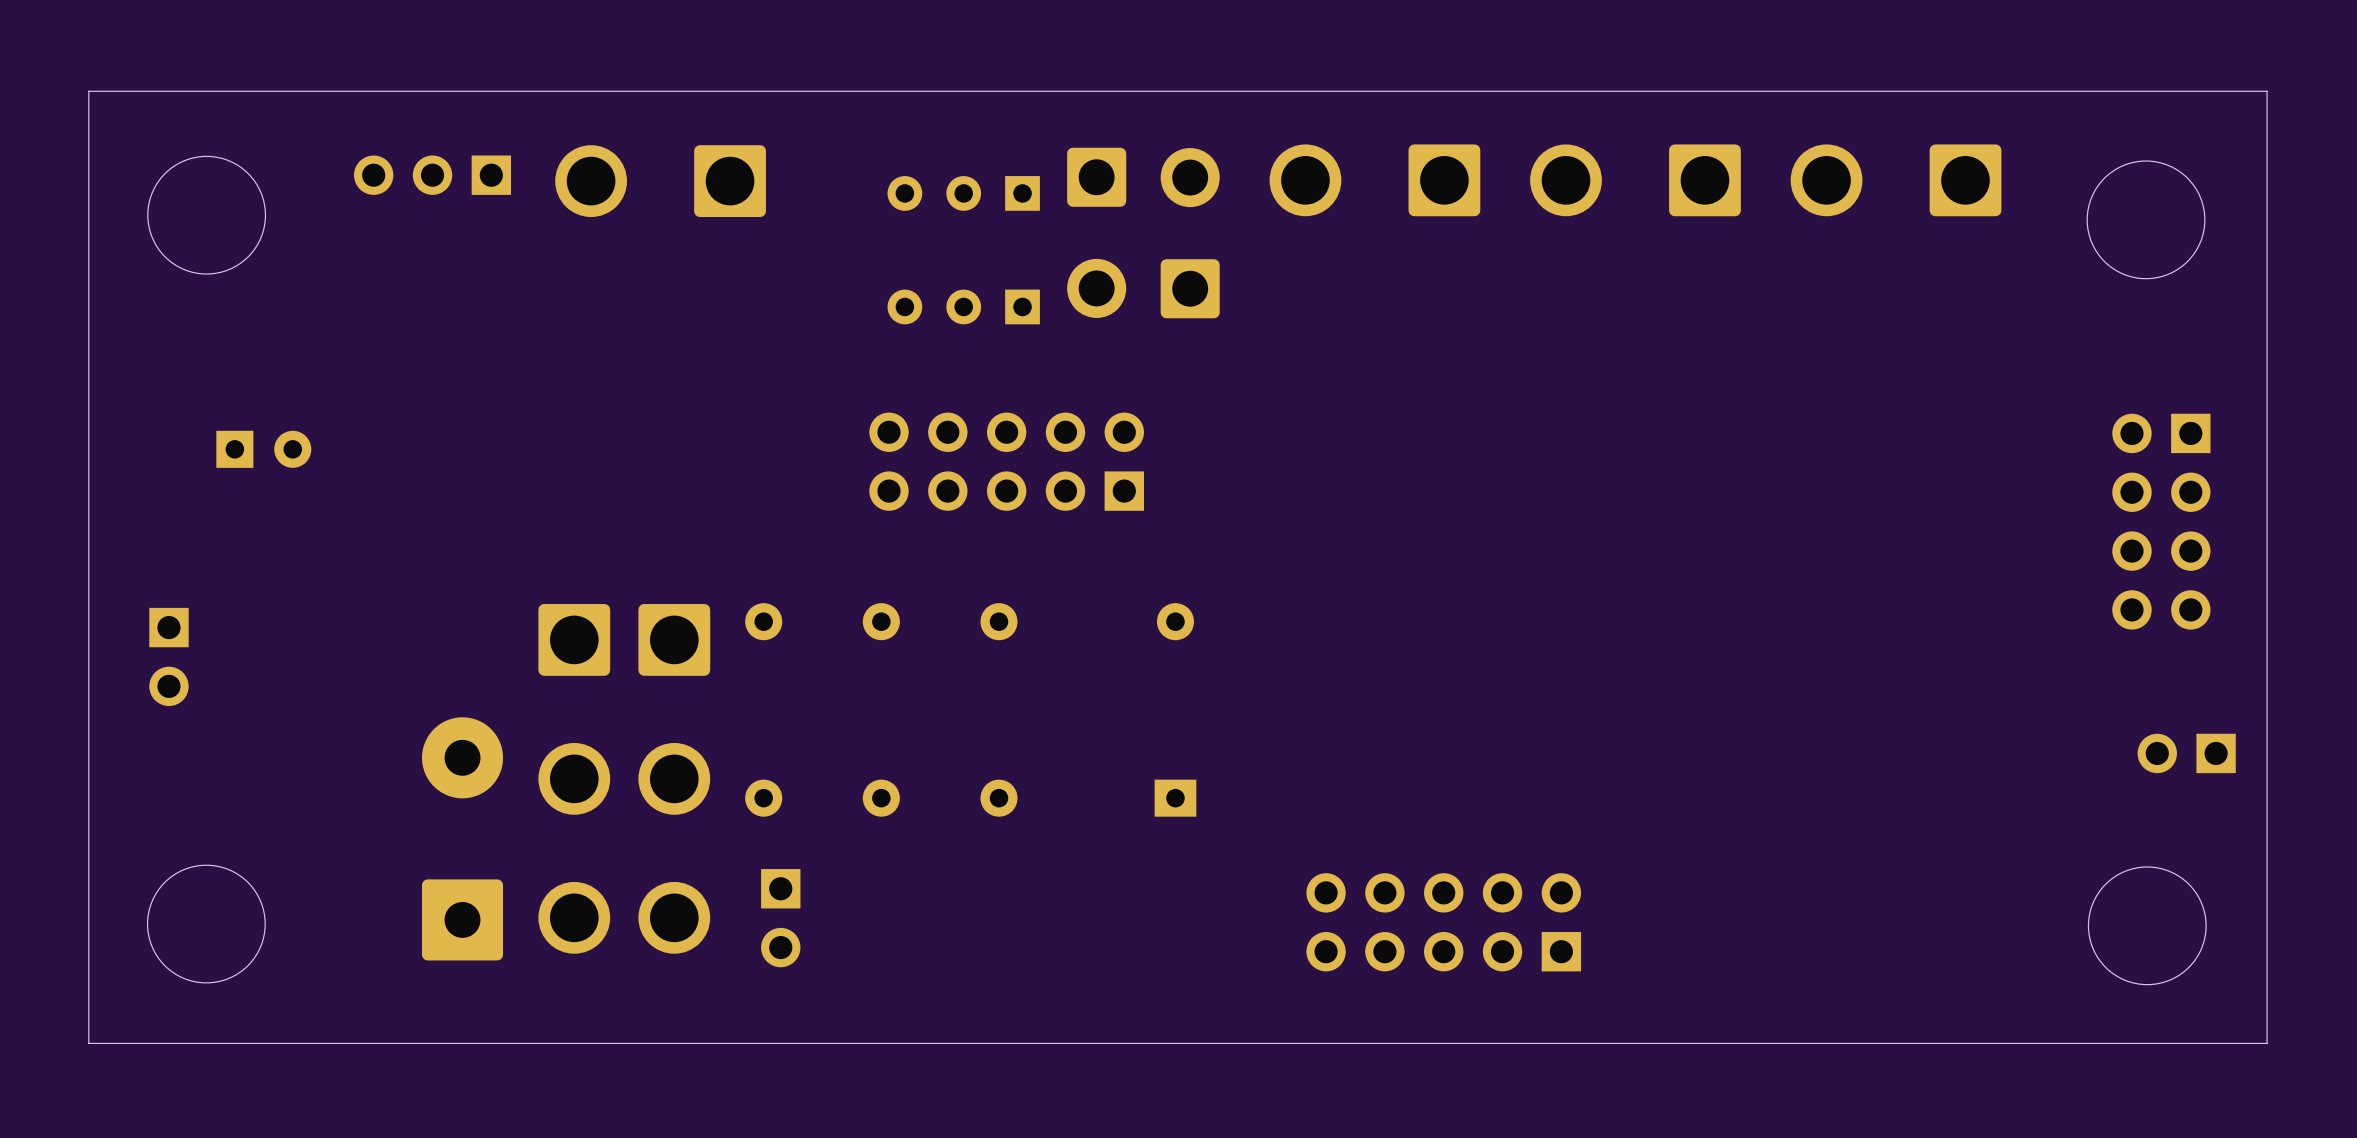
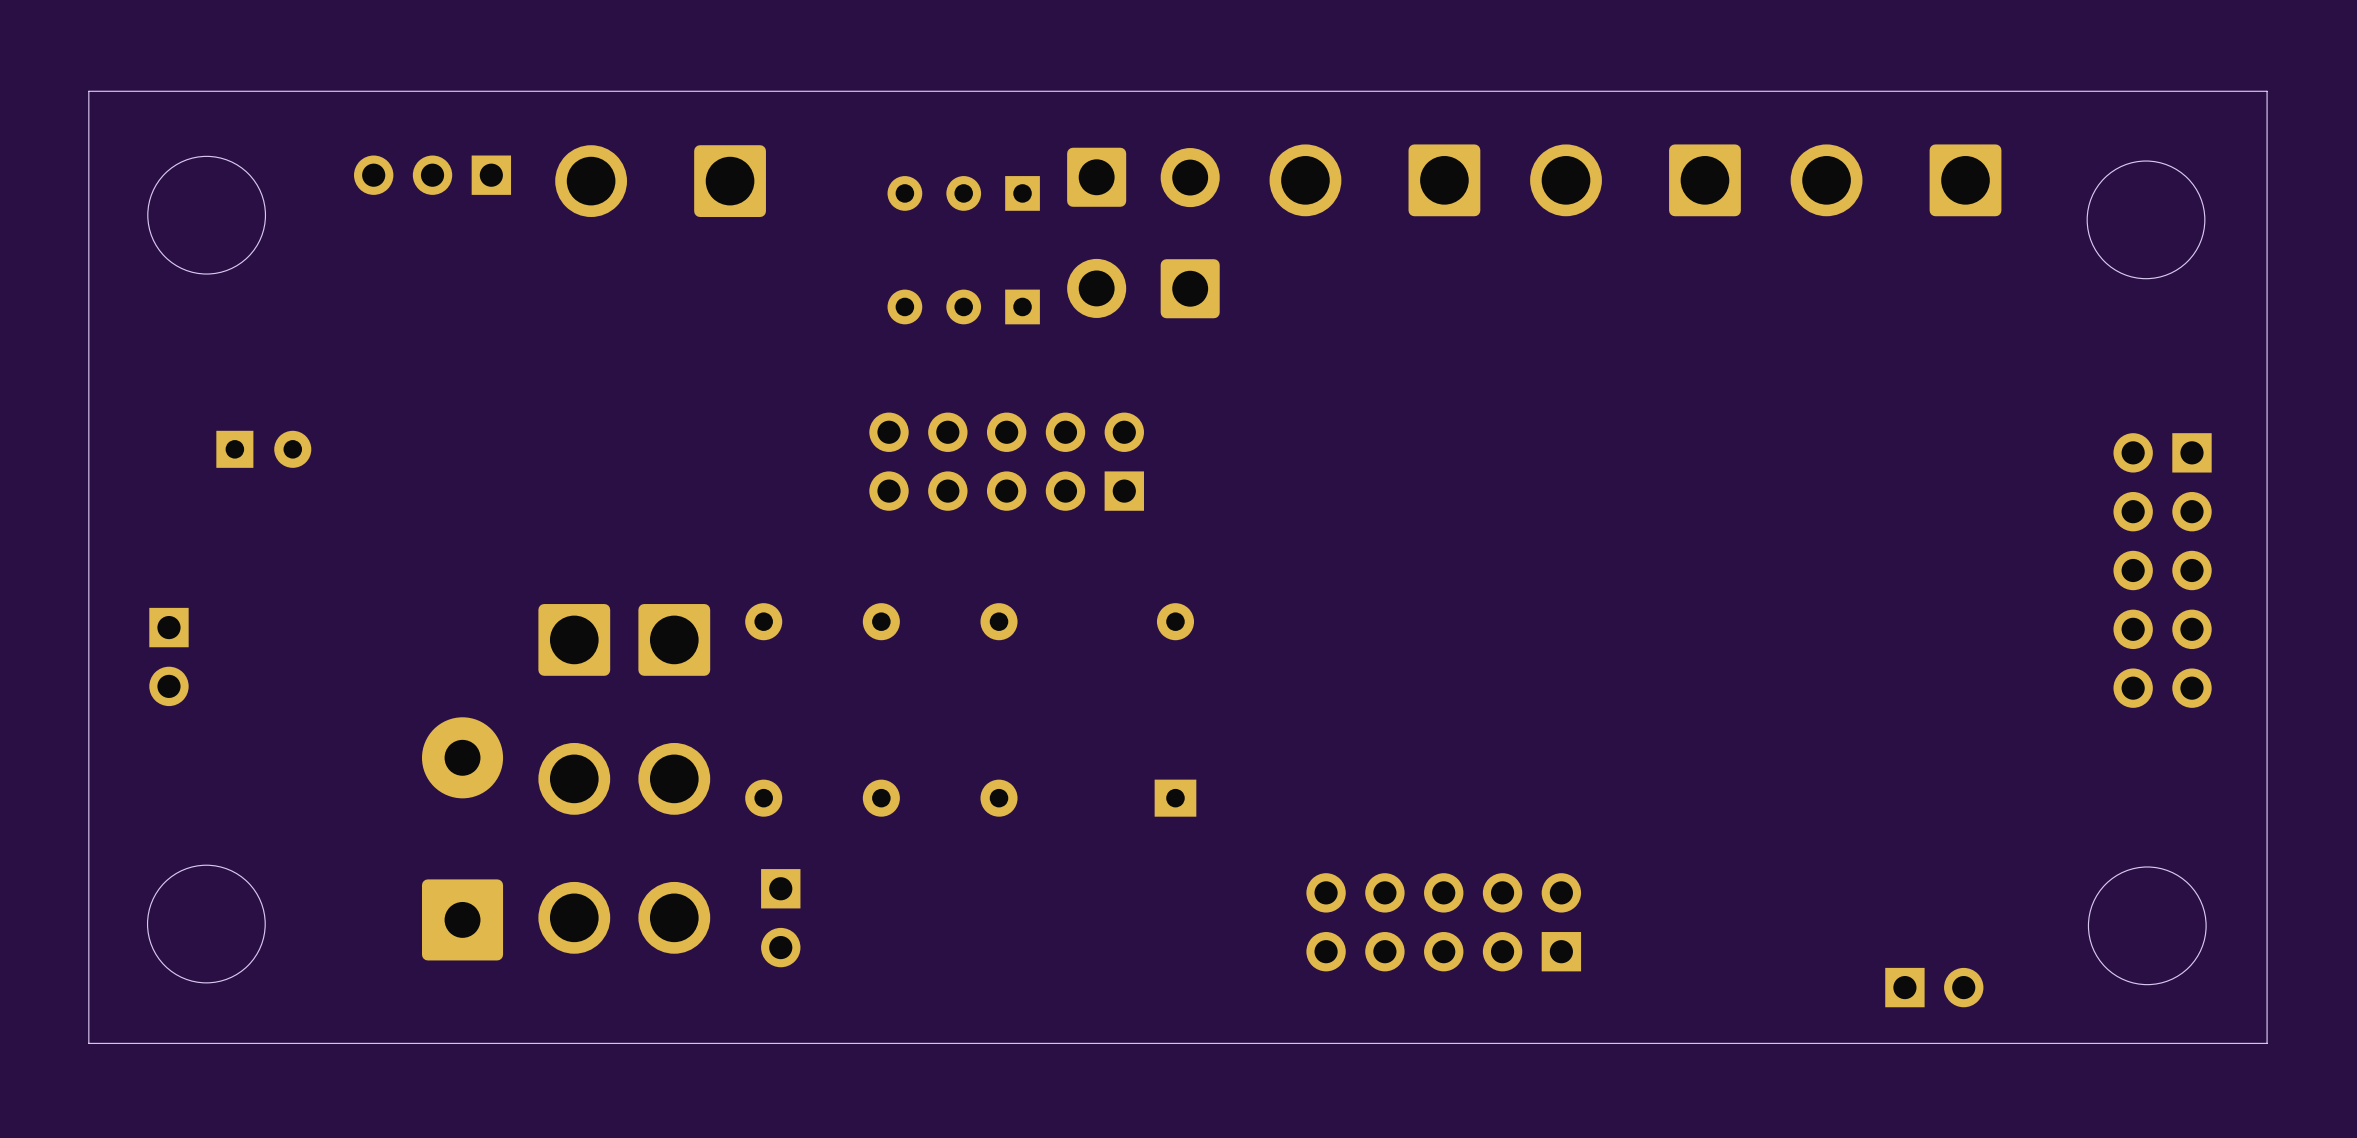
part: (2161, 521) -> none
part: none -> (2162, 570)
part rotation: 0° (2186, 753) -> 180° (1934, 987)
part position: (2186, 753) -> (1934, 987)

